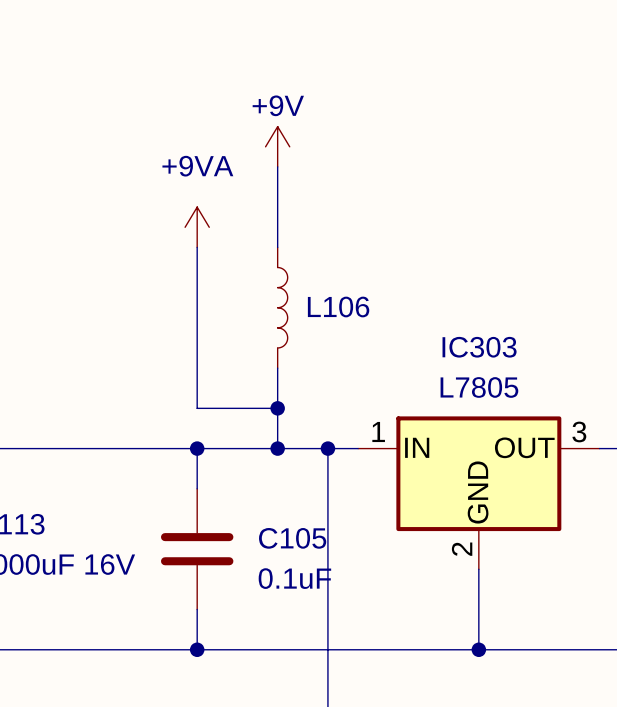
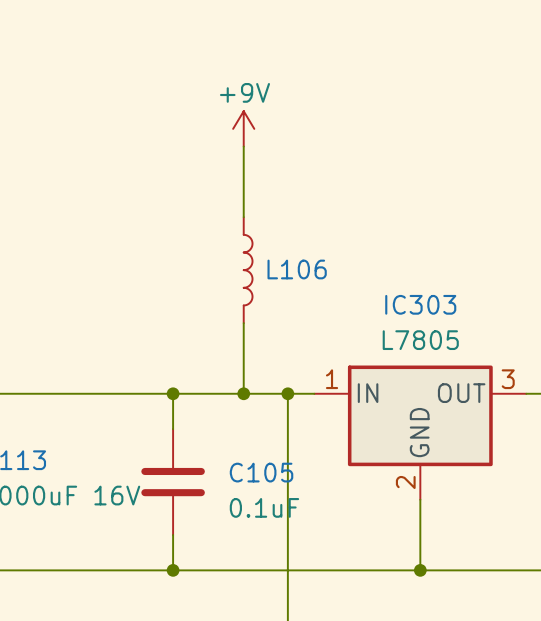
power symbol: +9VA (197, 227) -> none
wire: (197, 247) (197, 408) (277, 408) -> none
junction: (277, 408) -> none

